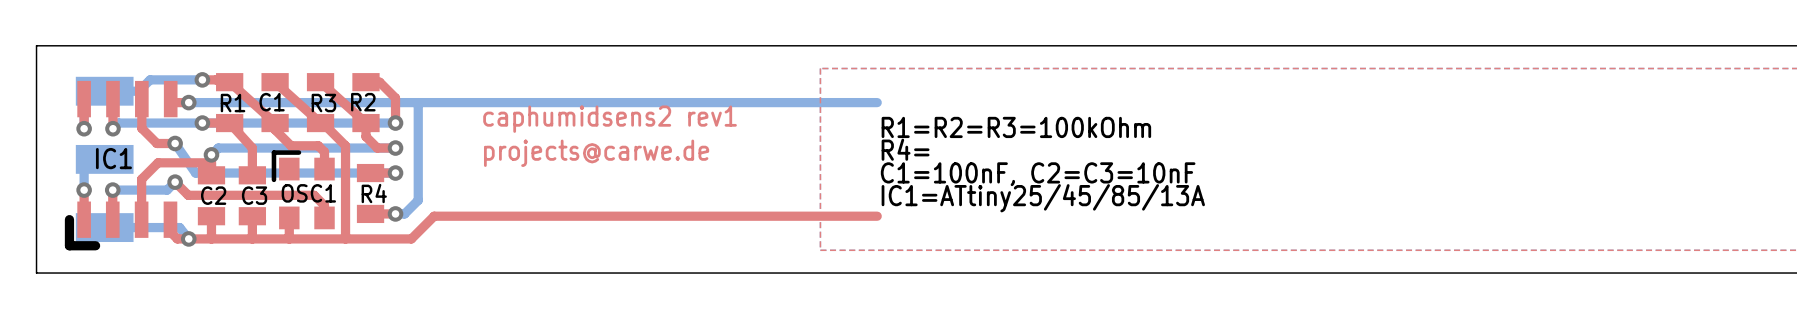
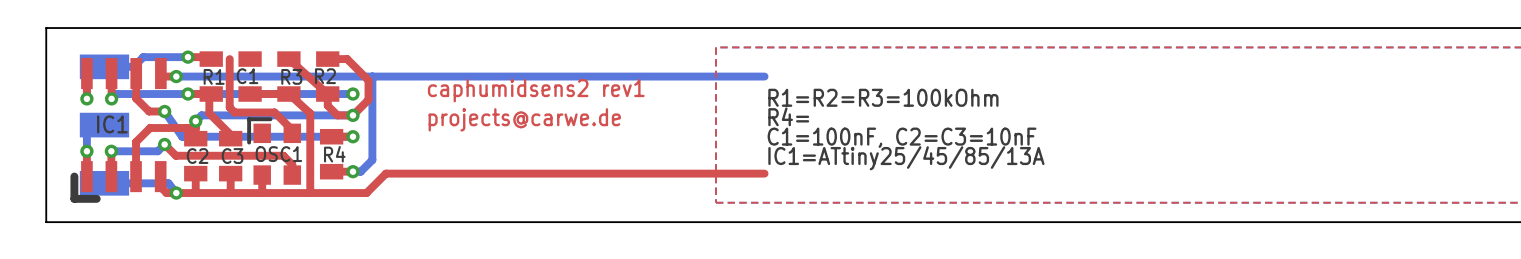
top track: (216, 79) (229, 82) (275, 123) (275, 129) (291, 145) (318, 145) (324, 152) (324, 165) -> (229, 59) (229, 107) (234, 112) (274, 112) (292, 130)
top track: (275, 82) (322, 123) (345, 145) -> (250, 94) (288, 94) (310, 113)
top track: (379, 82) (395, 98) (395, 123) -> (339, 59) (347, 59) (368, 80) (368, 99) (352, 115)
top track: (227, 123) (229, 123) (252, 148) (252, 170) -> (209, 94) (209, 113) (230, 134)

